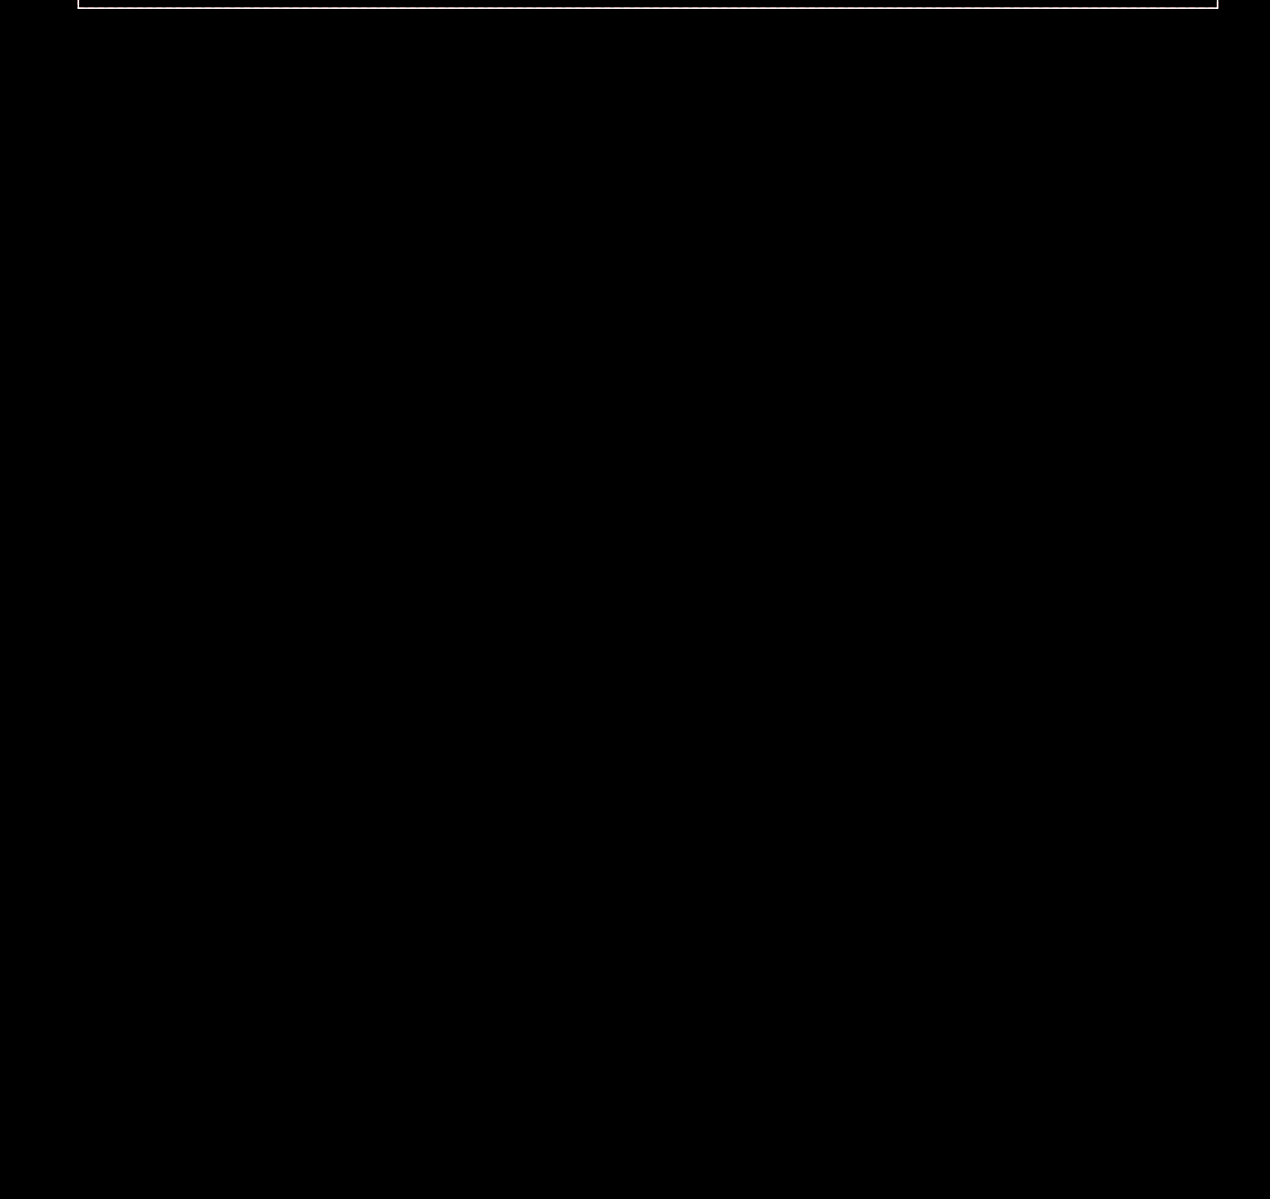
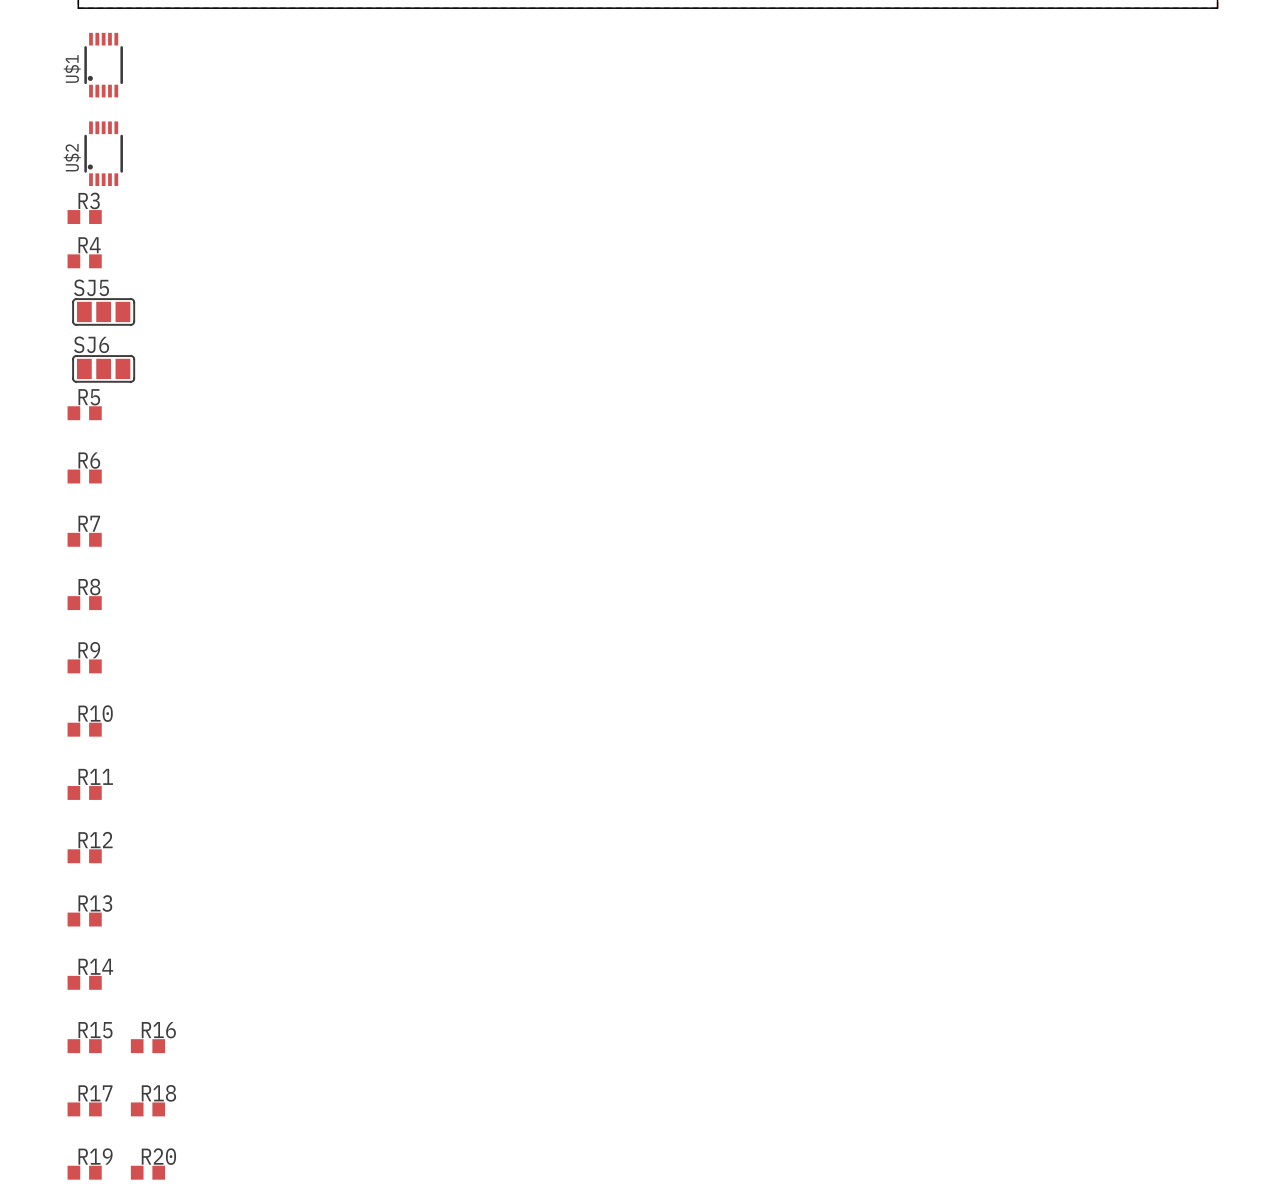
U$1: none -> (103, 65)
U$2: none -> (103, 153)
R3: none -> (84, 217)
R4: none -> (84, 261)
SJ5: none -> (103, 311)
SJ6: none -> (103, 368)
R5: none -> (84, 413)
R6: none -> (84, 476)
R7: none -> (84, 539)
R8: none -> (84, 603)
R9: none -> (84, 666)
R10: none -> (84, 729)
R11: none -> (84, 792)
R12: none -> (84, 856)
R13: none -> (84, 919)
R14: none -> (84, 982)
R15: none -> (84, 1046)
R16: none -> (147, 1046)
R17: none -> (84, 1109)
R18: none -> (147, 1109)
R19: none -> (84, 1172)
R20: none -> (147, 1172)

